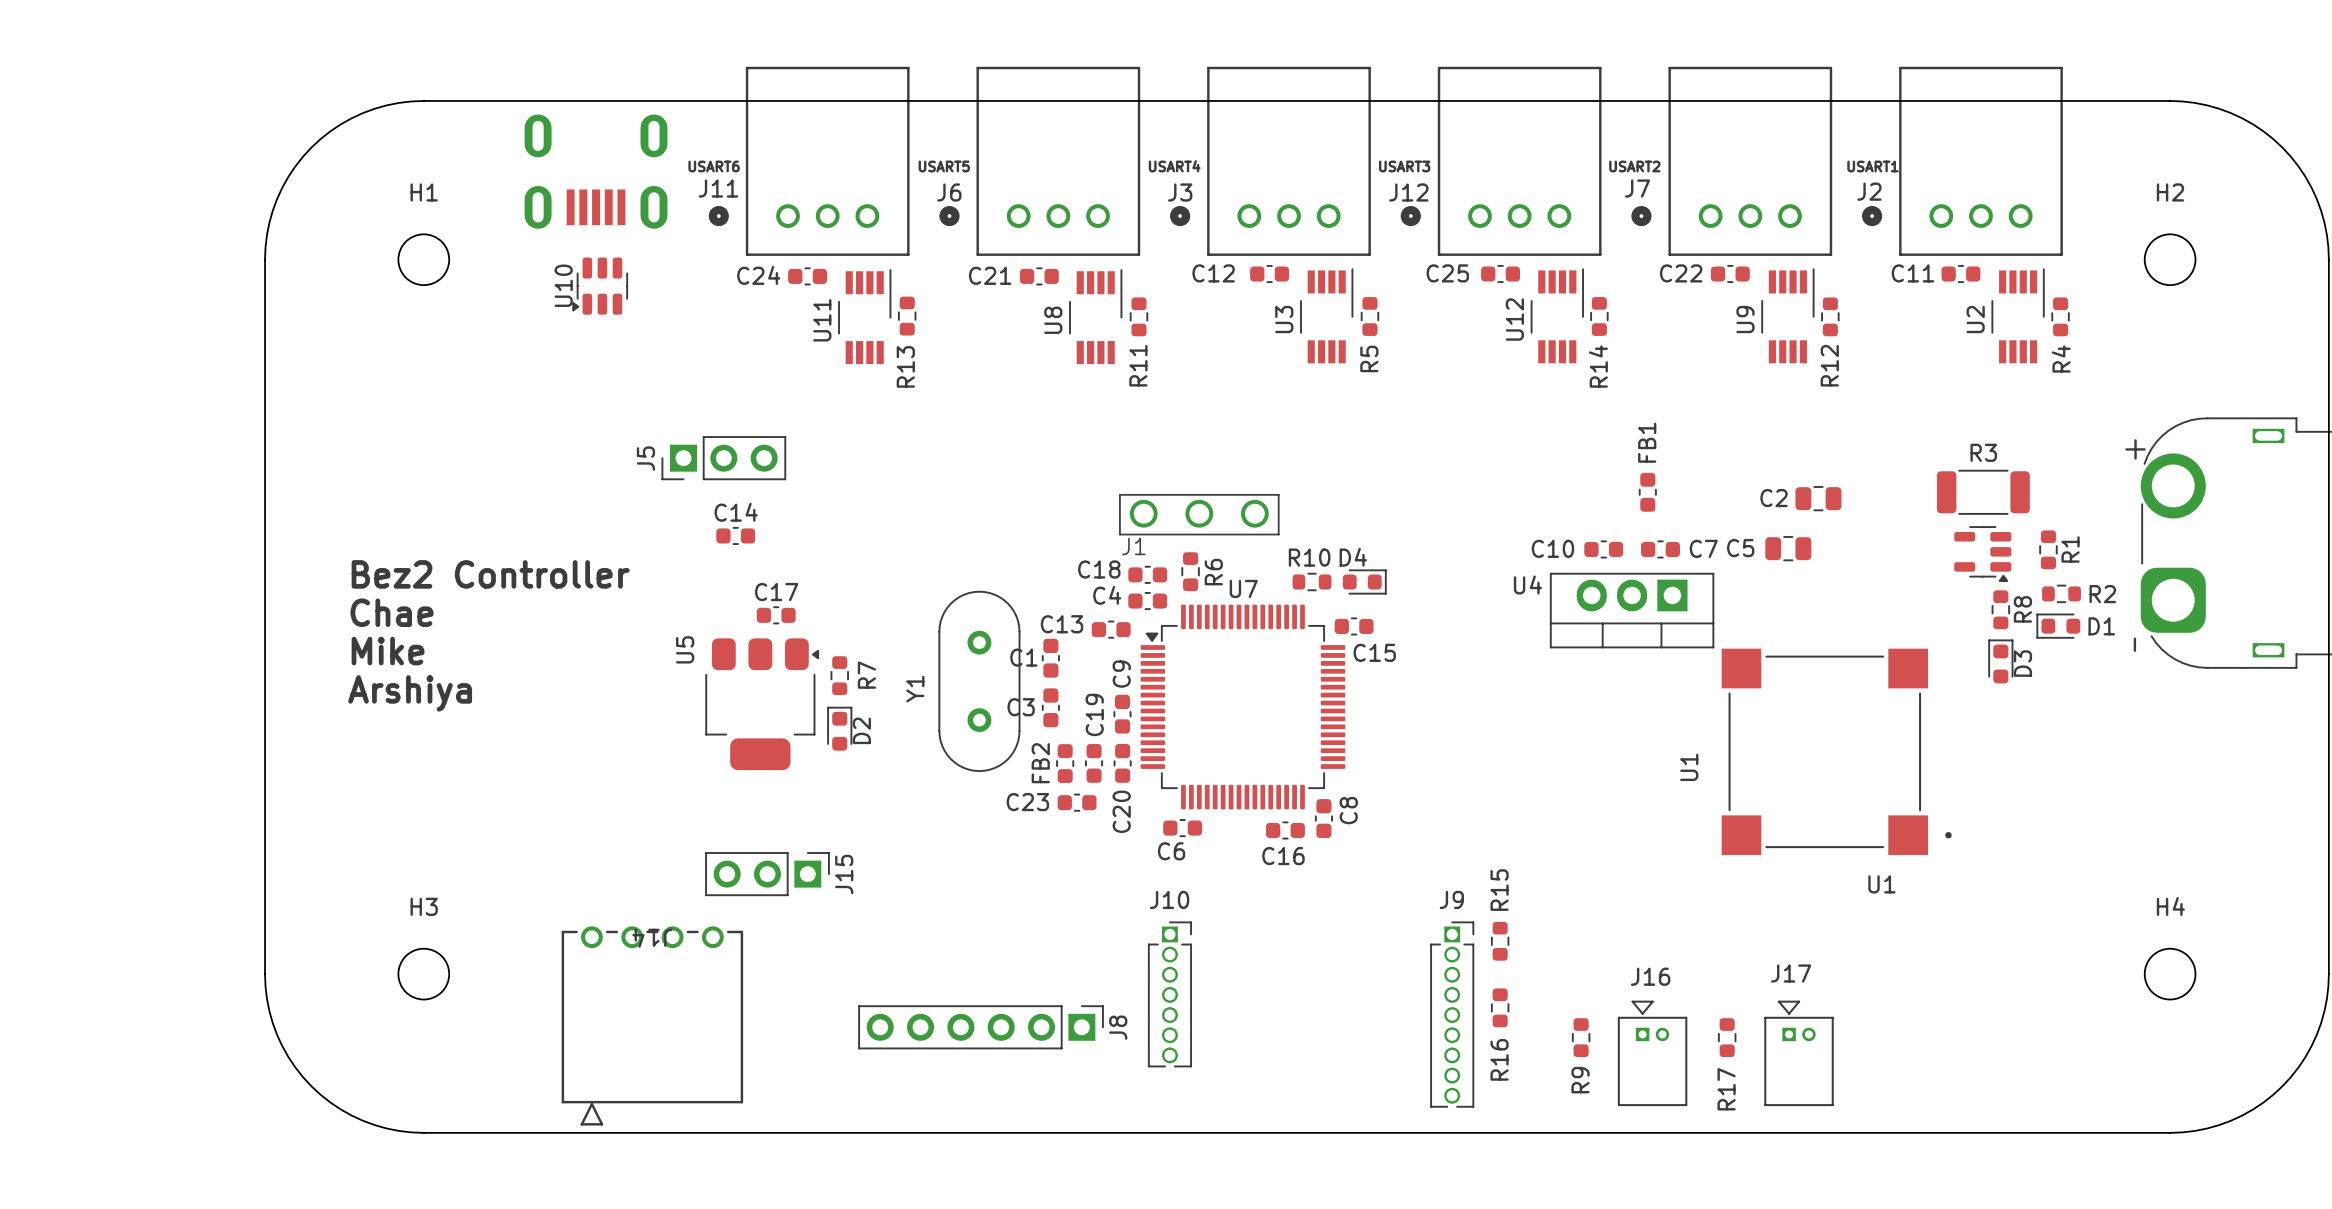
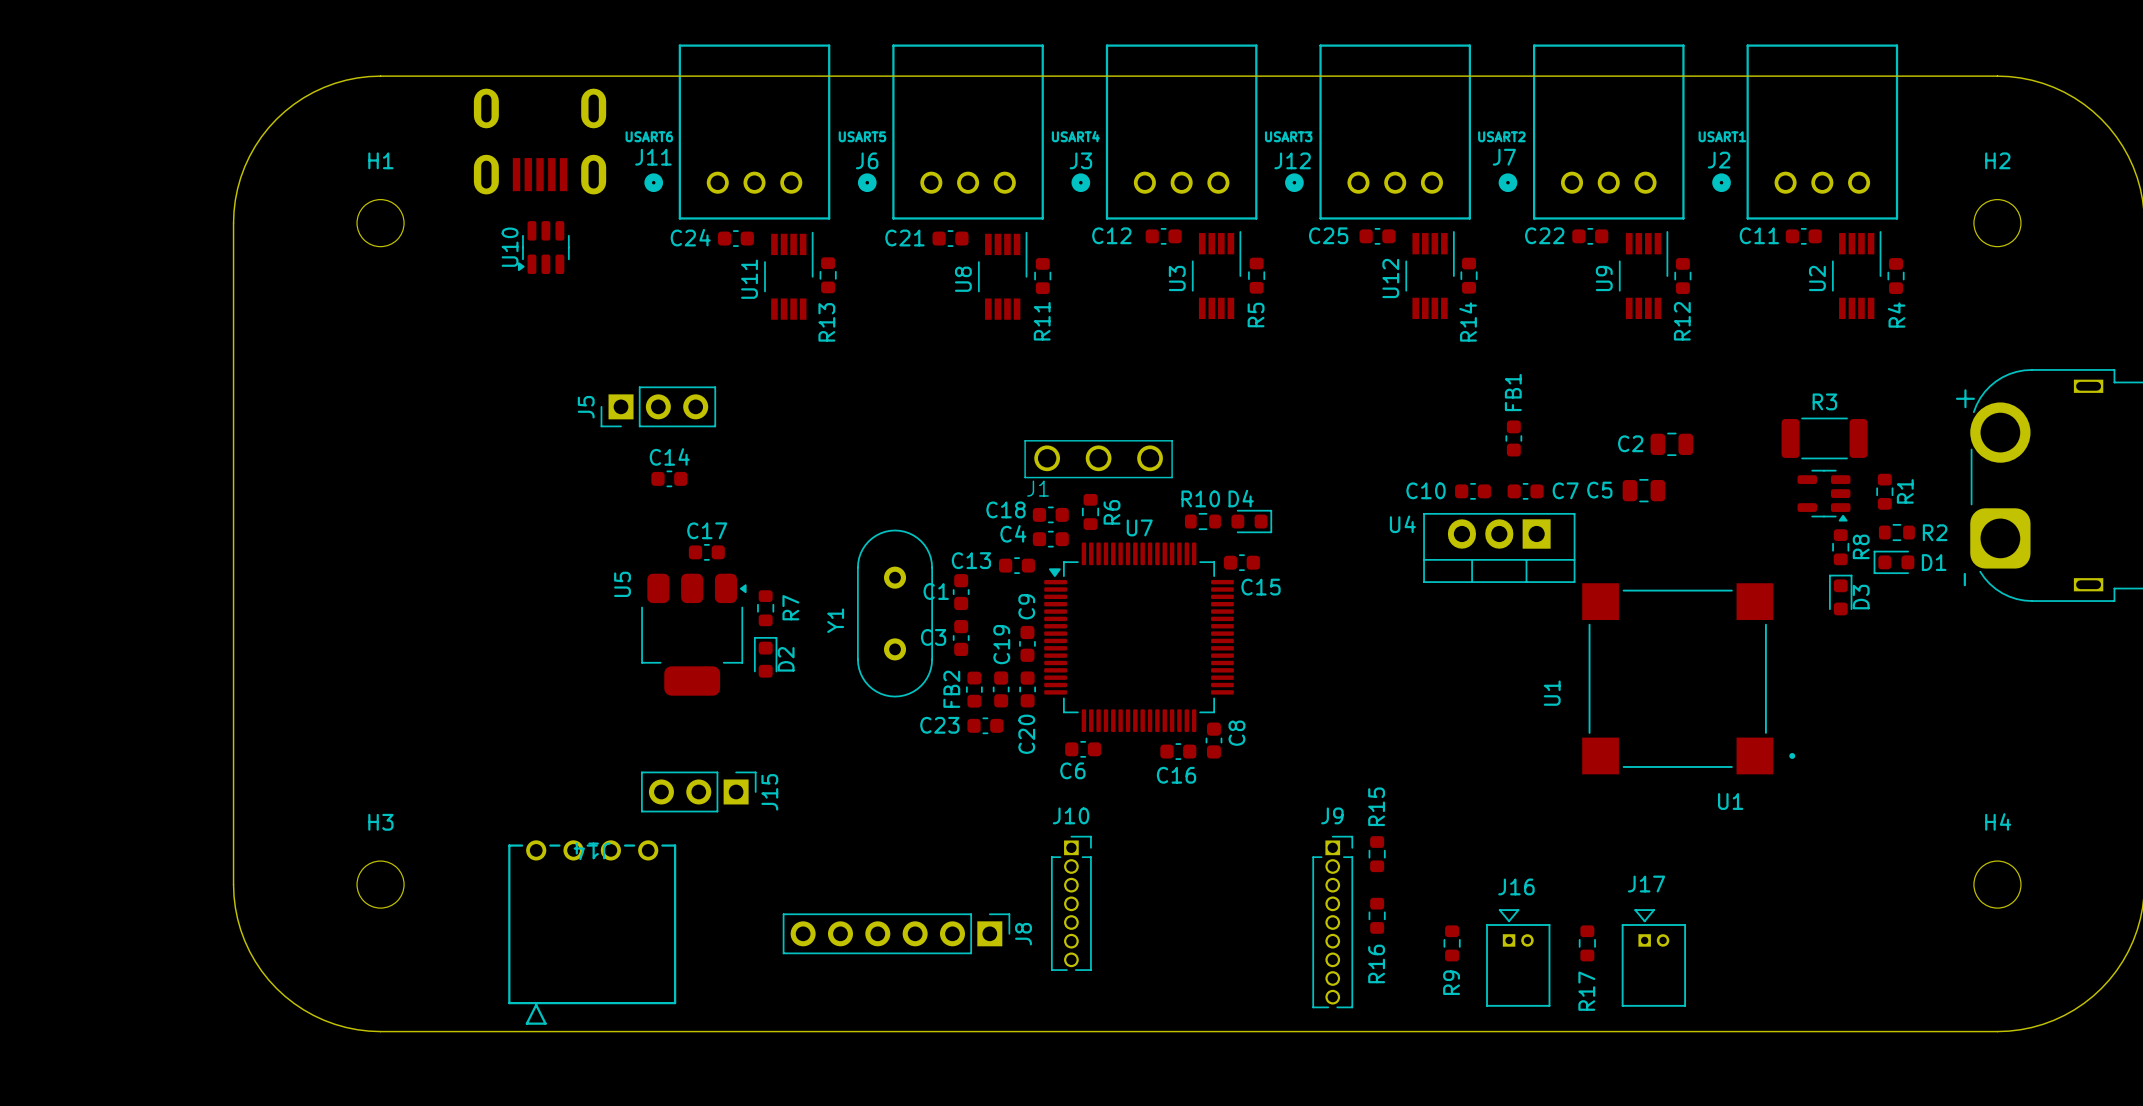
text: Bez2 Controller (490, 574) -> none
text: Chae (392, 612) -> none
text: Mike (388, 651) -> none
text: Arshiya (410, 693) -> none

